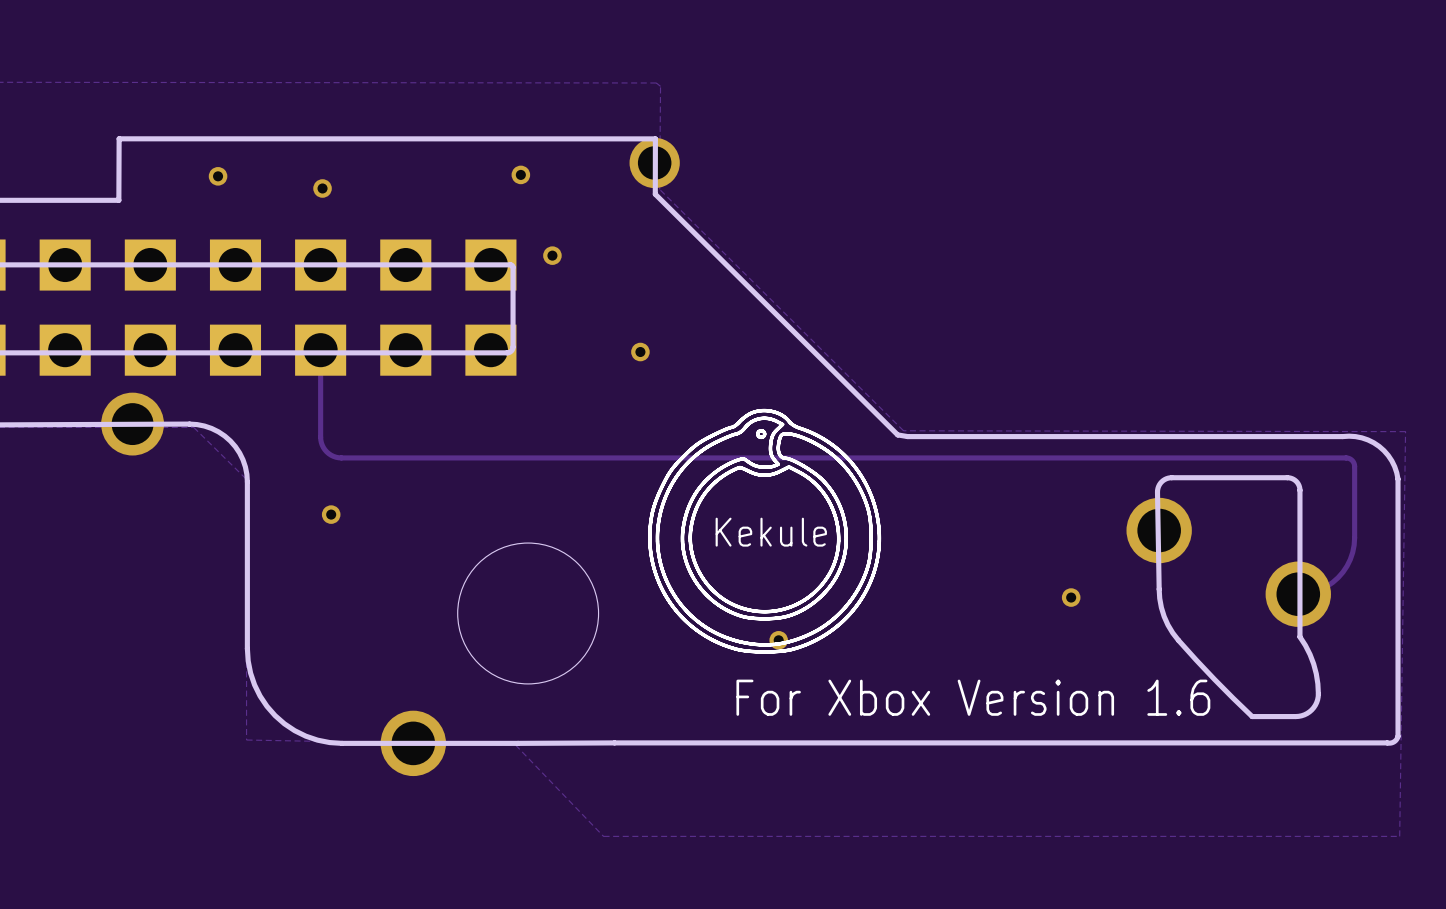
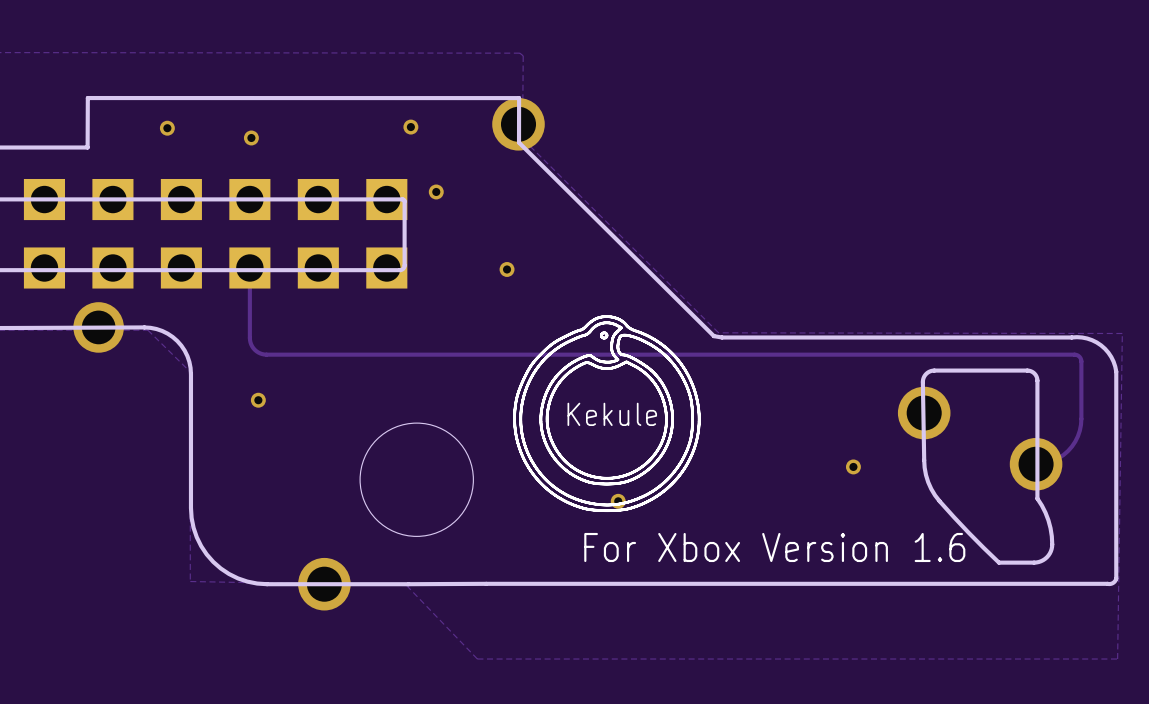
via size: [629, 137, 680, 189] -> [492, 98, 545, 151]

